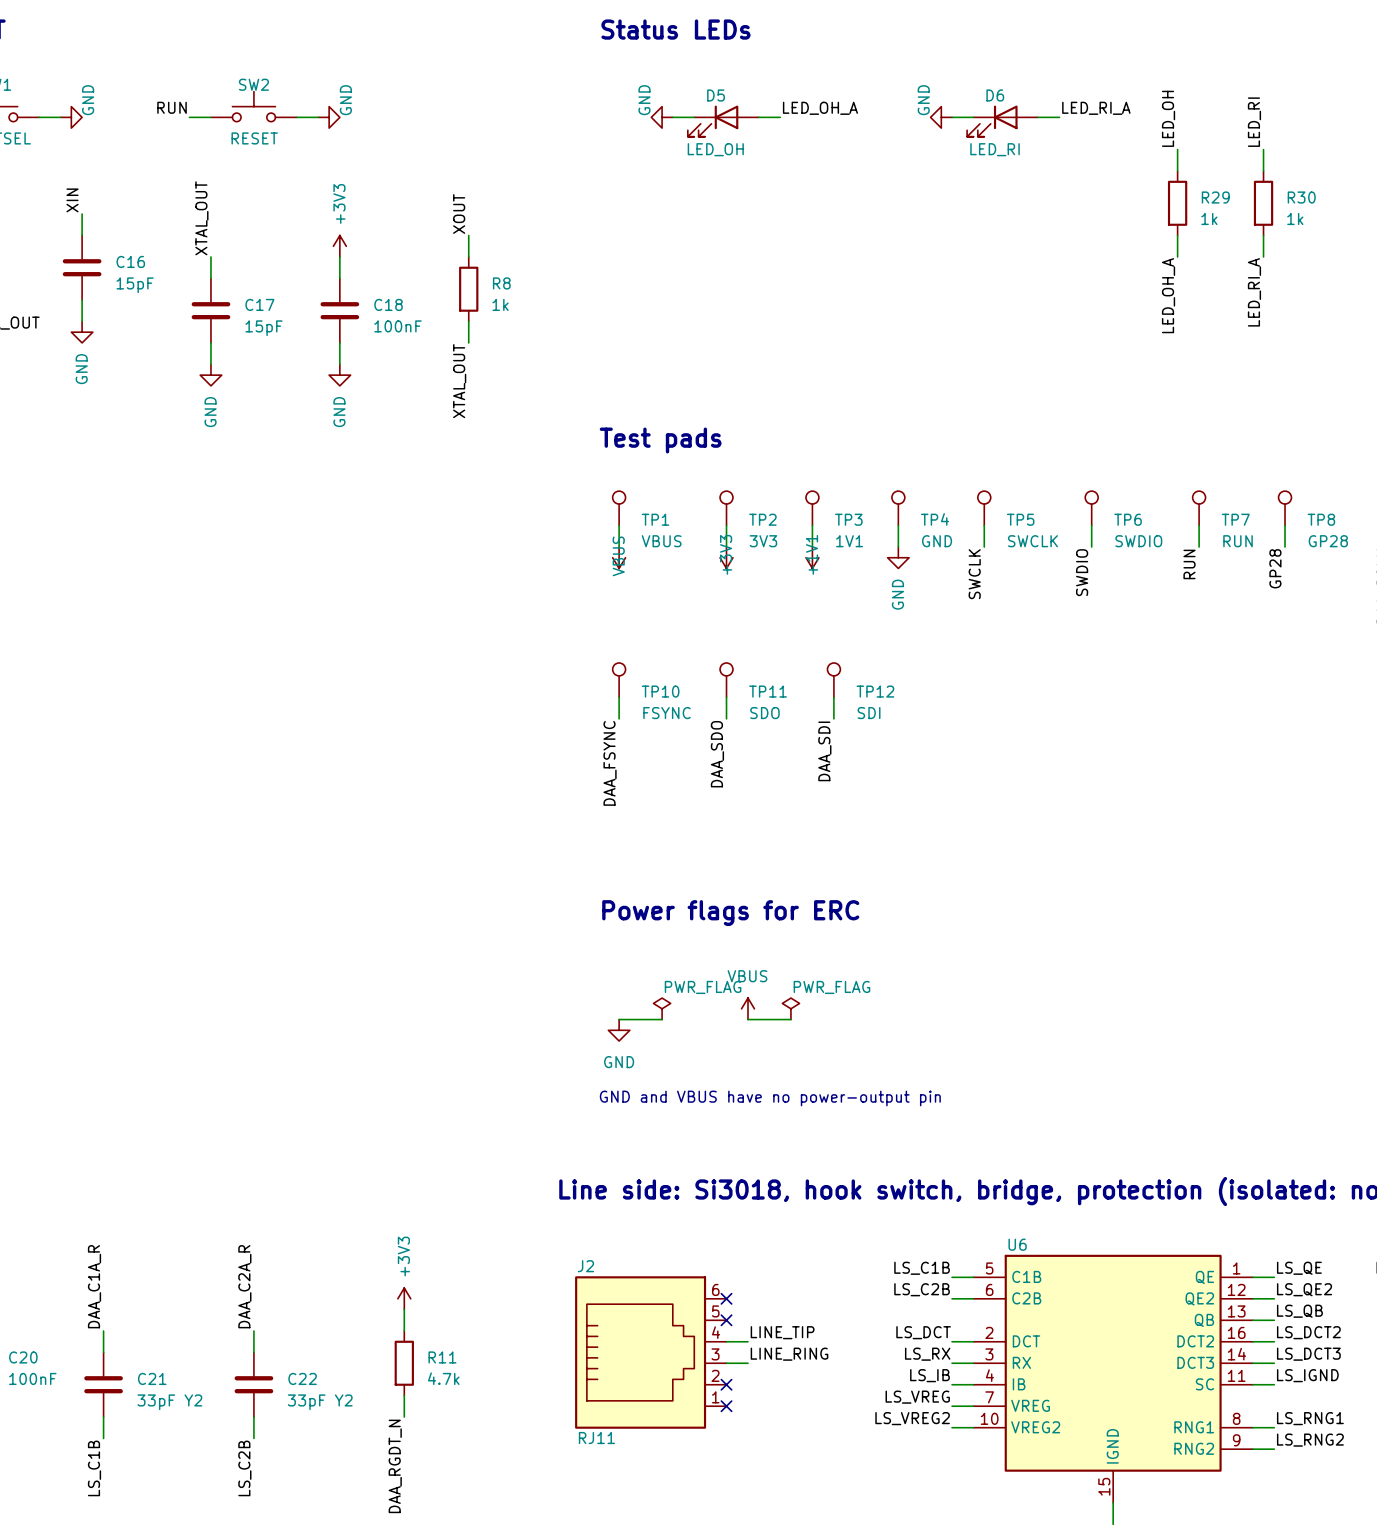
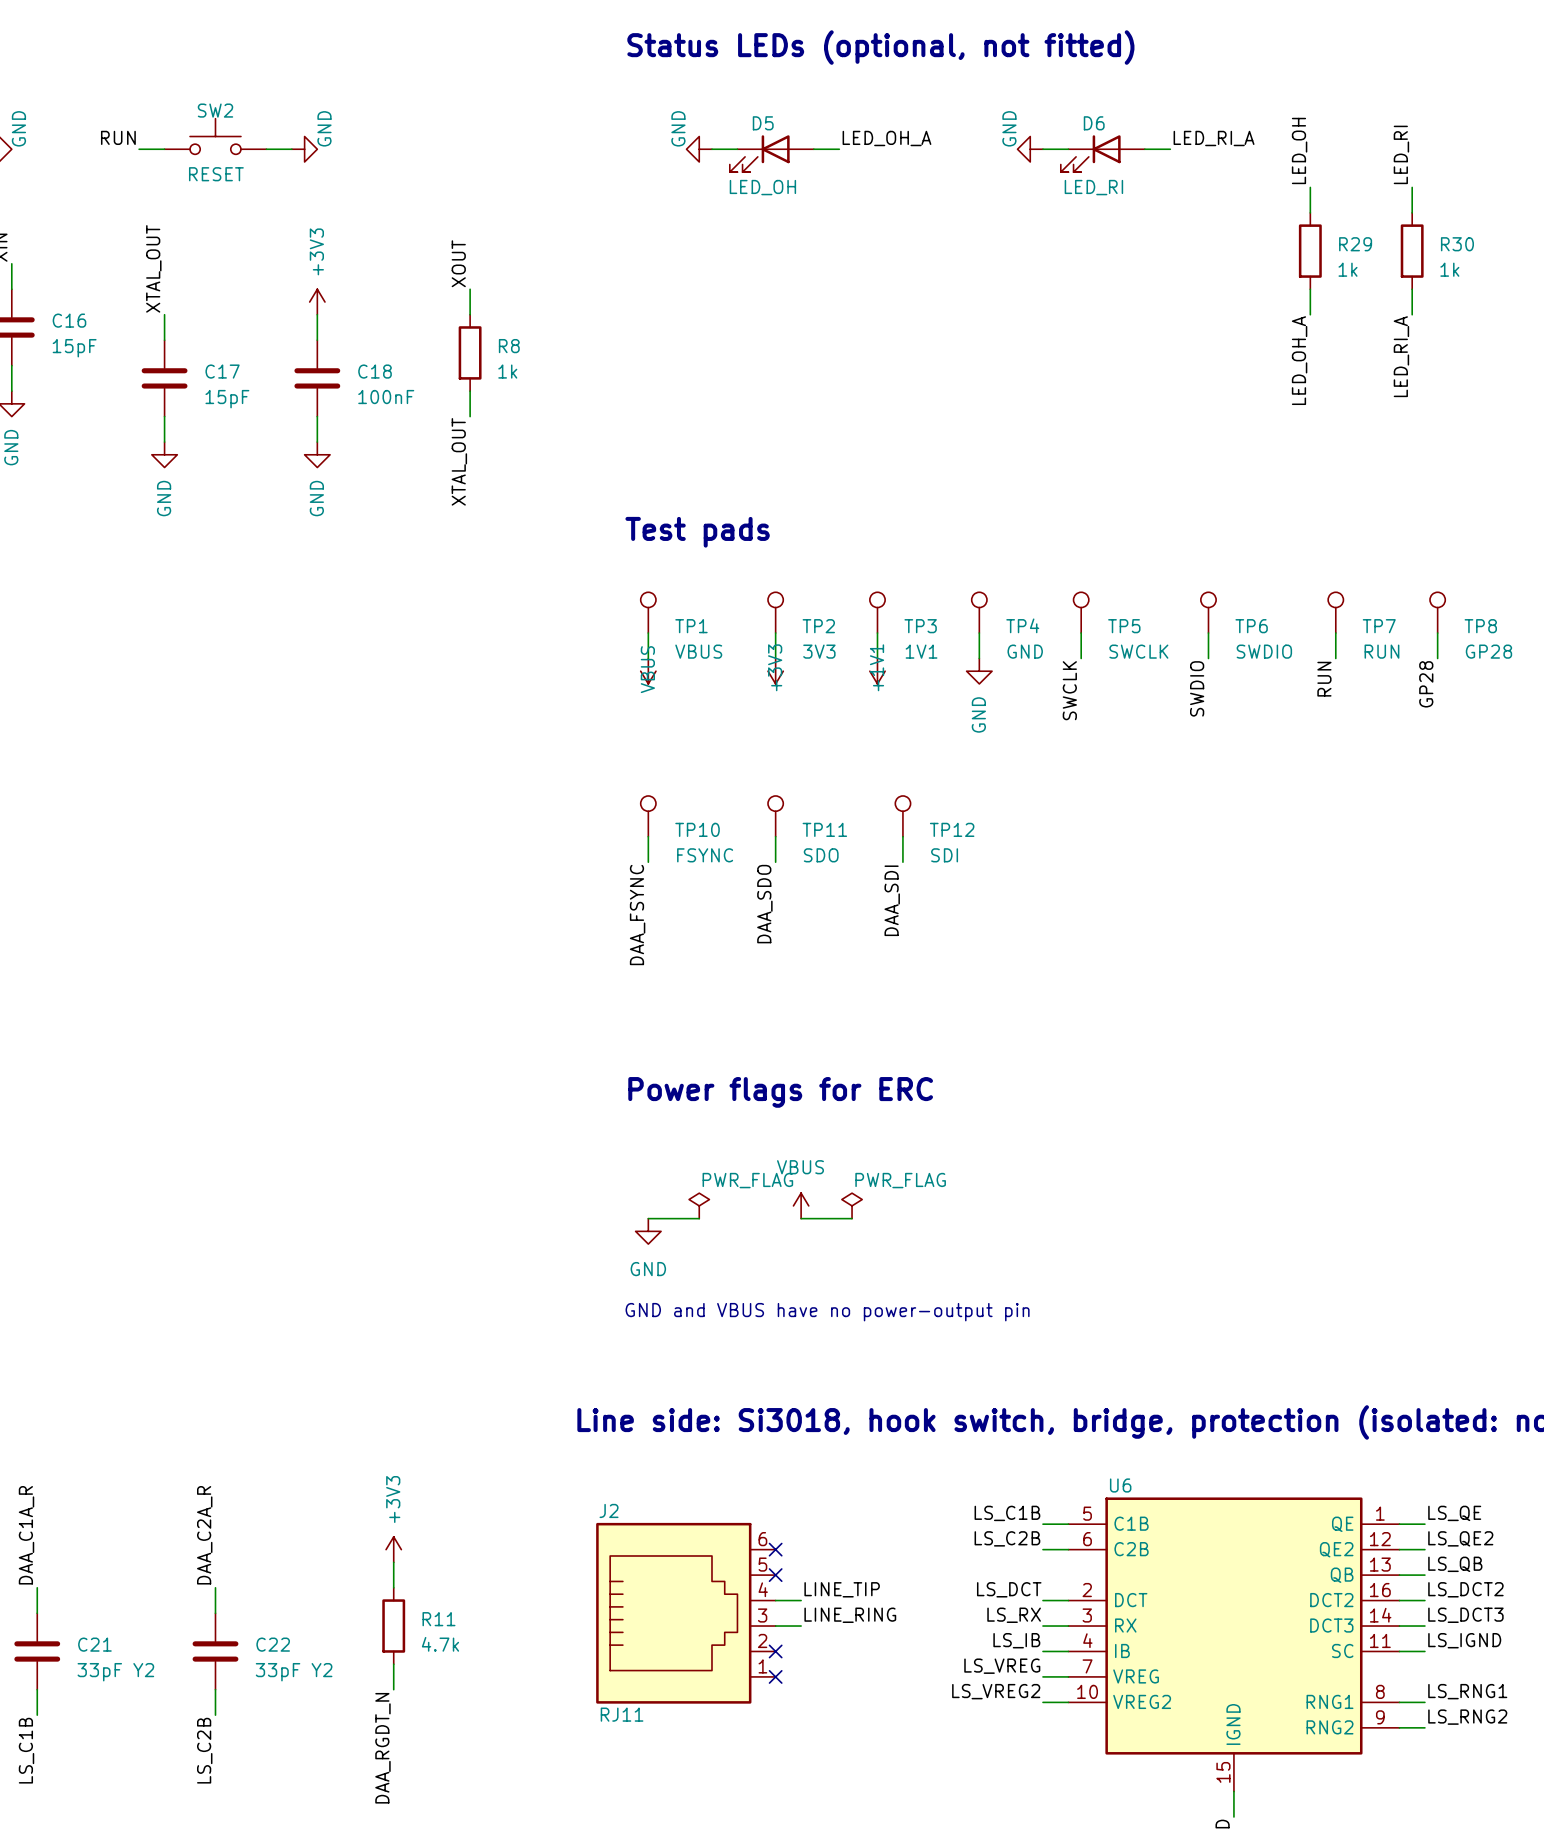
text: Status LEDs (675, 29) -> Status LEDs (optional, not fitted) (880, 47)

